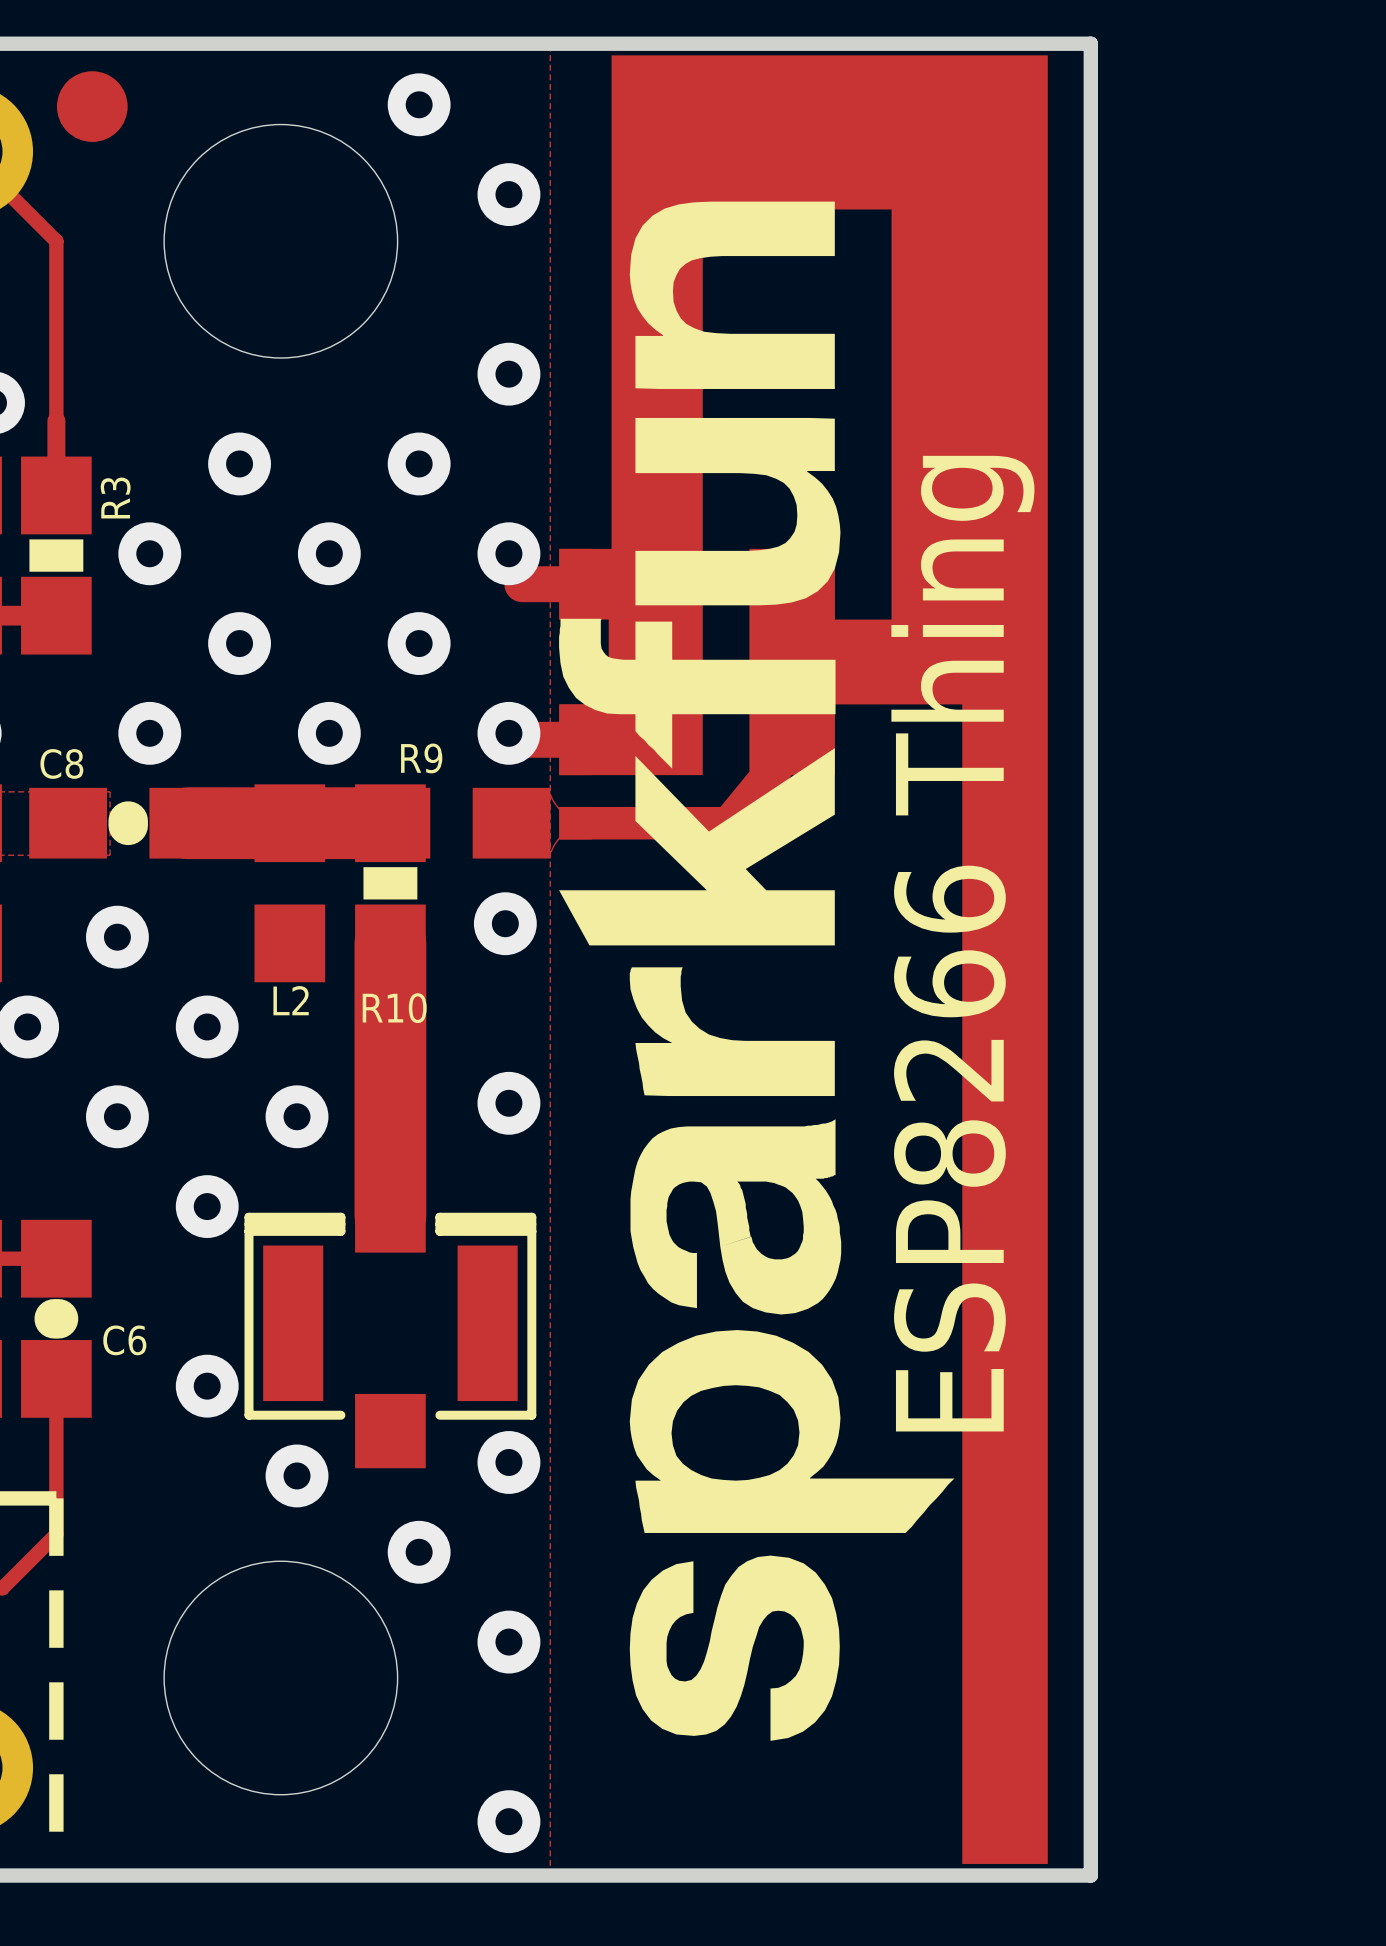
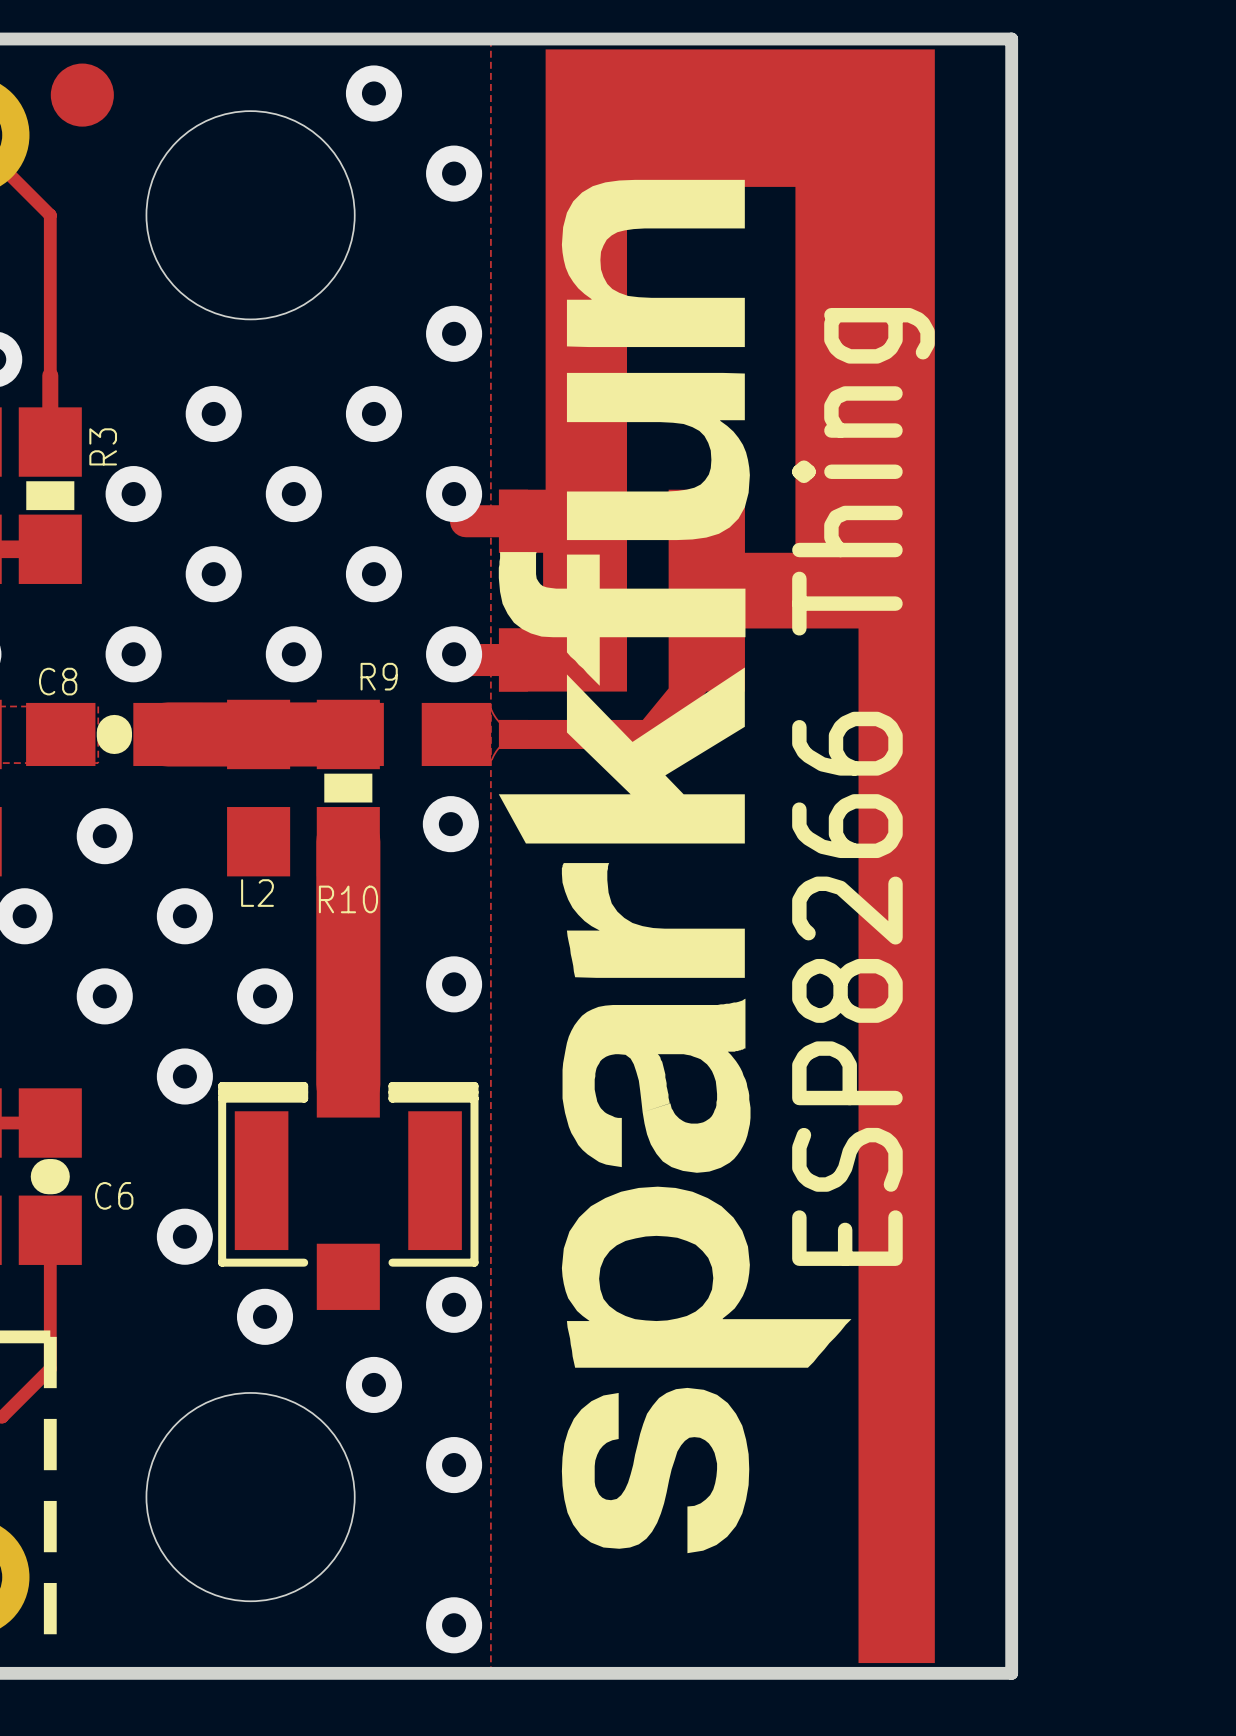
board edge: (1090, 43) (1090, 1875) -> (973, 39) (1011, 39) (1011, 1673) (973, 1673)

